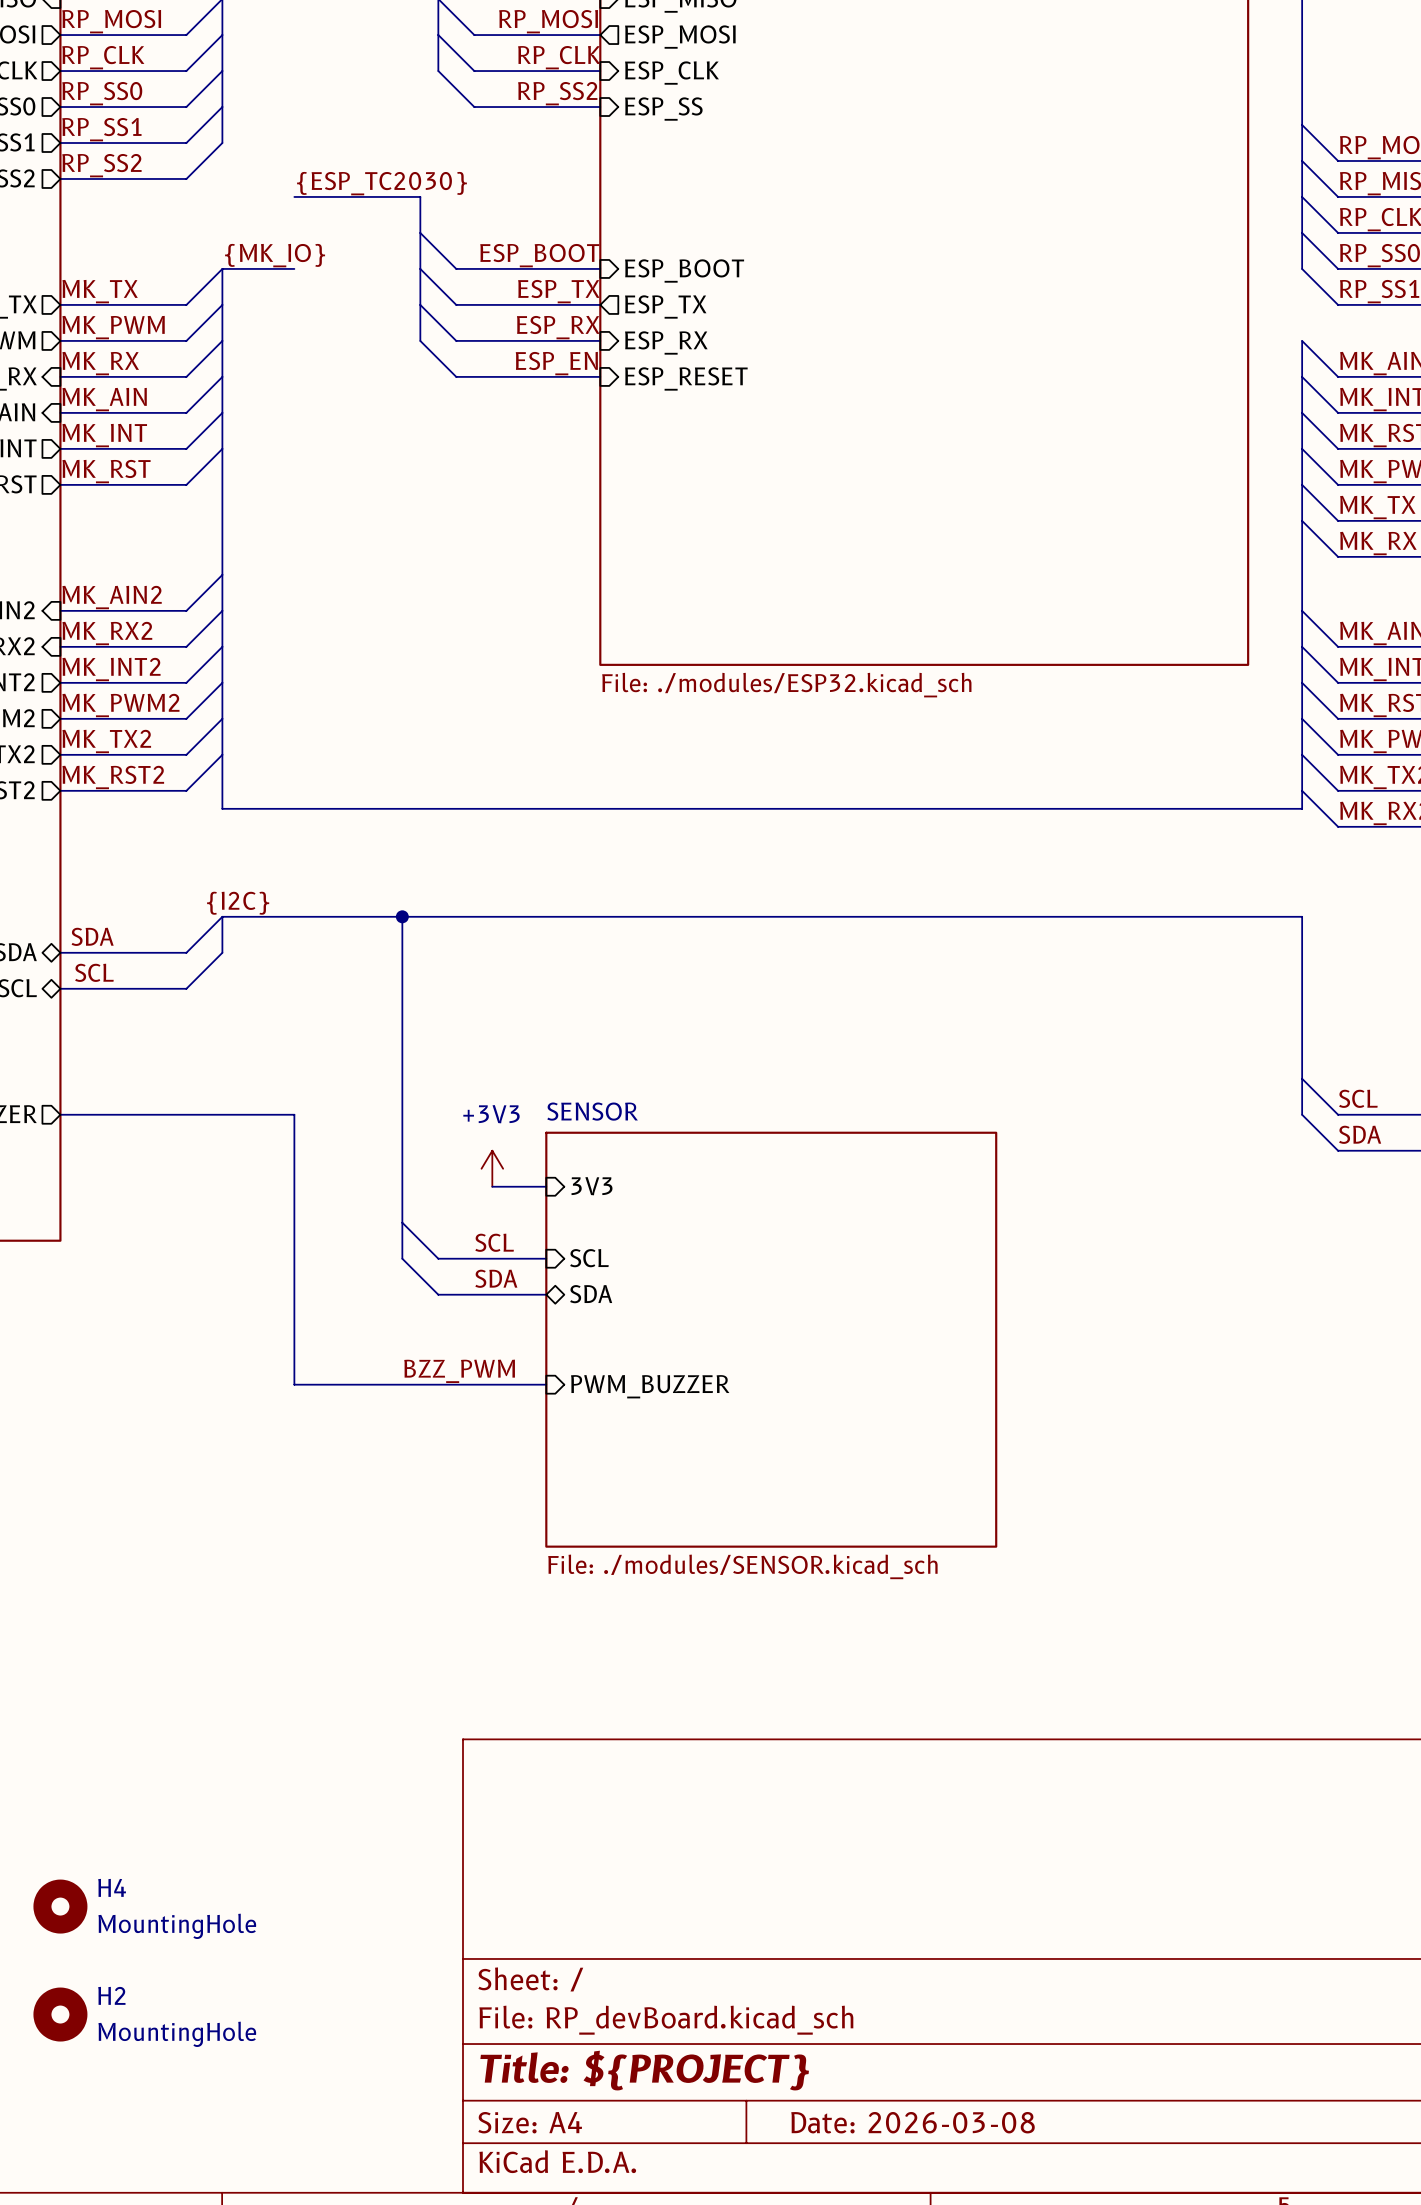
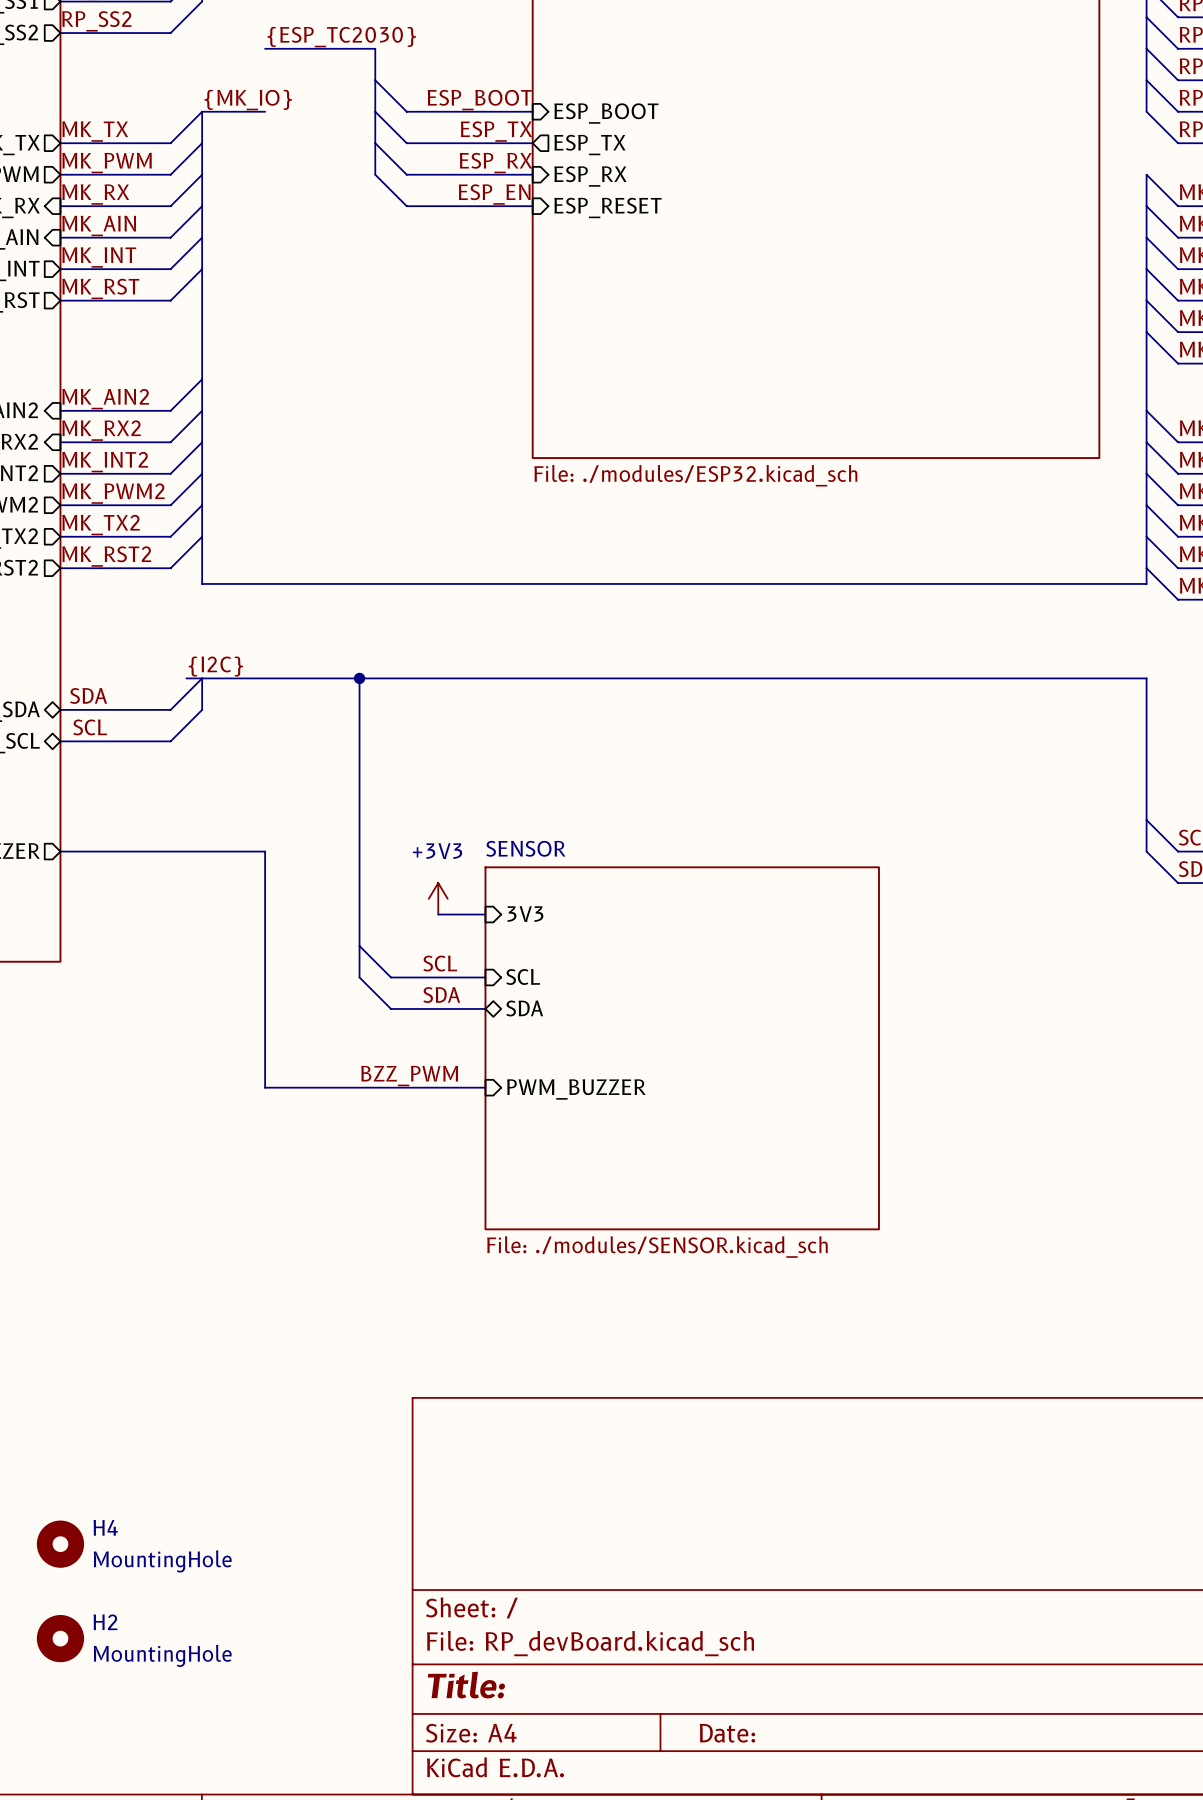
wire: none -> (186, 678) (202, 678)
title block: Title: ${PROJECT} (644, 2070) -> Title: (466, 1685)
title block: Date: 2026-03-08 (913, 2122) -> Date: (727, 1733)

